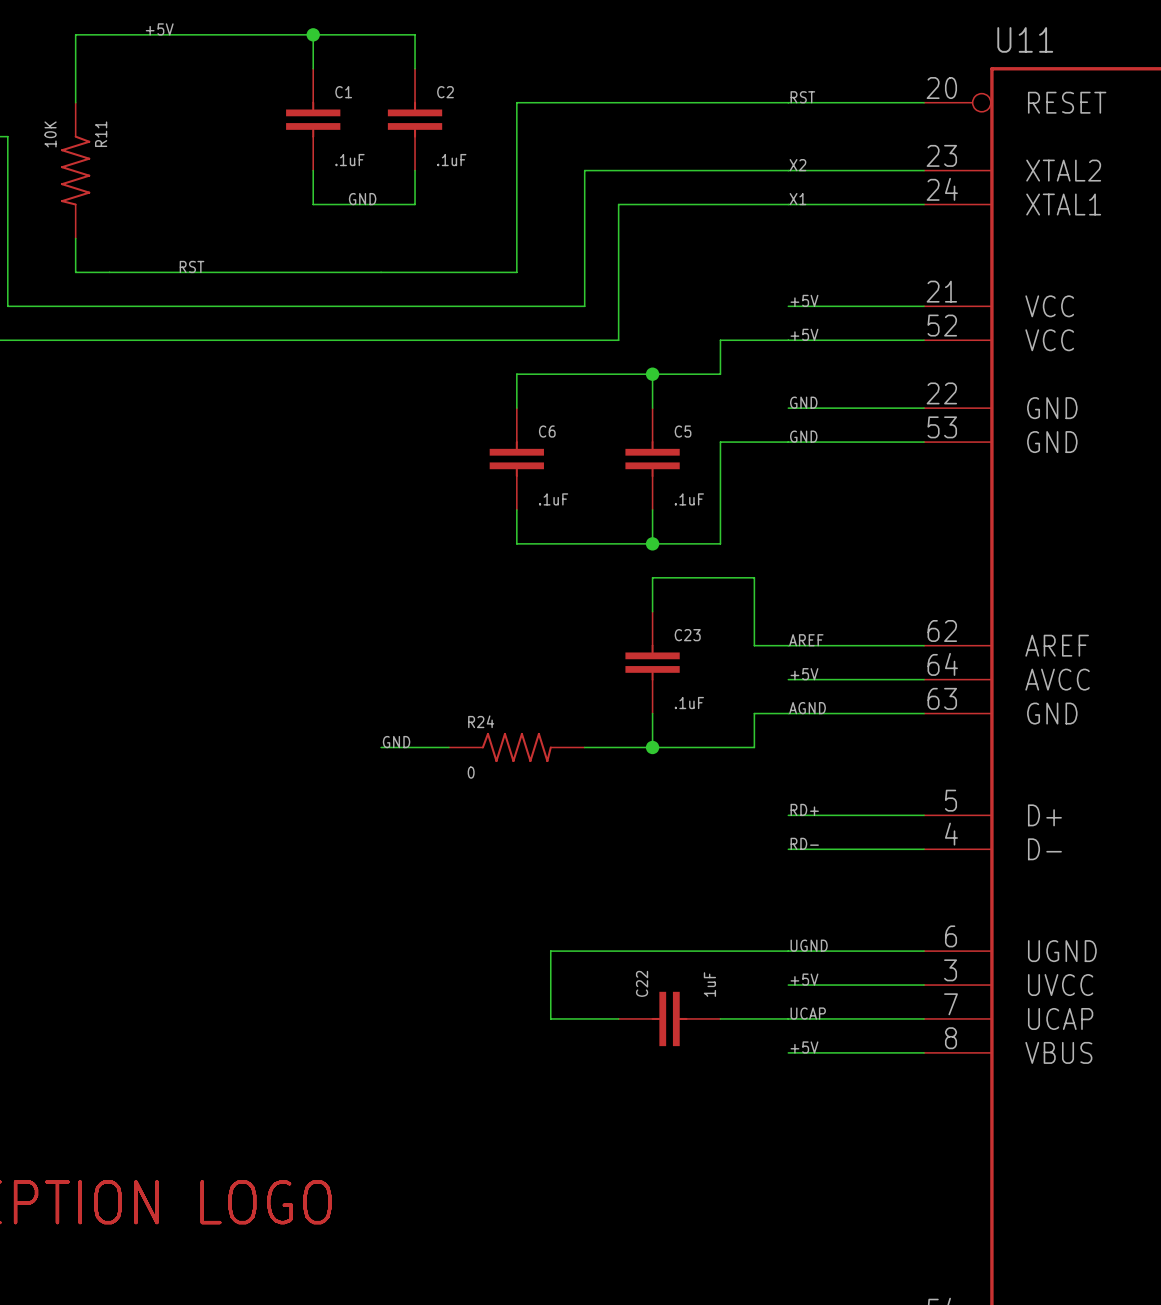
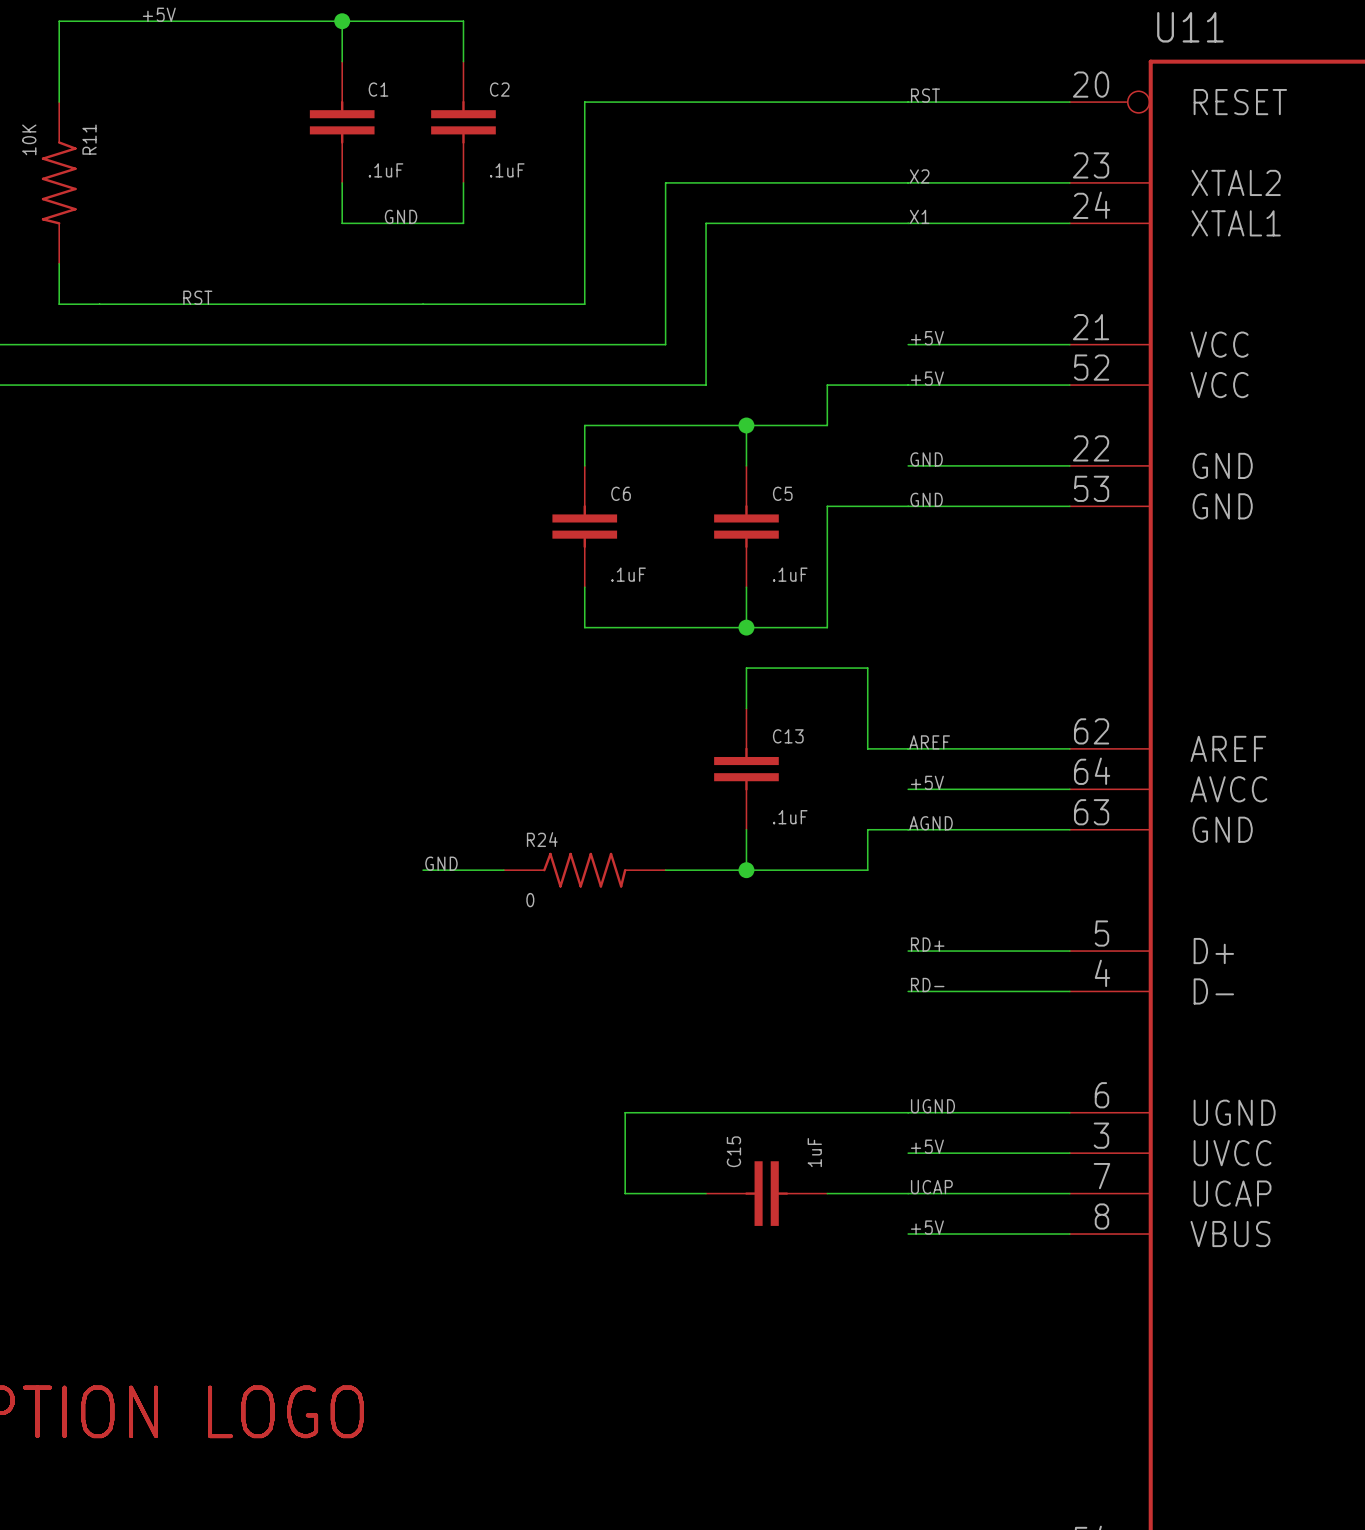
C23 name: C23 (687, 635) -> C13 (788, 736)
C22 name: C22 (642, 983) -> C15 (733, 1151)

